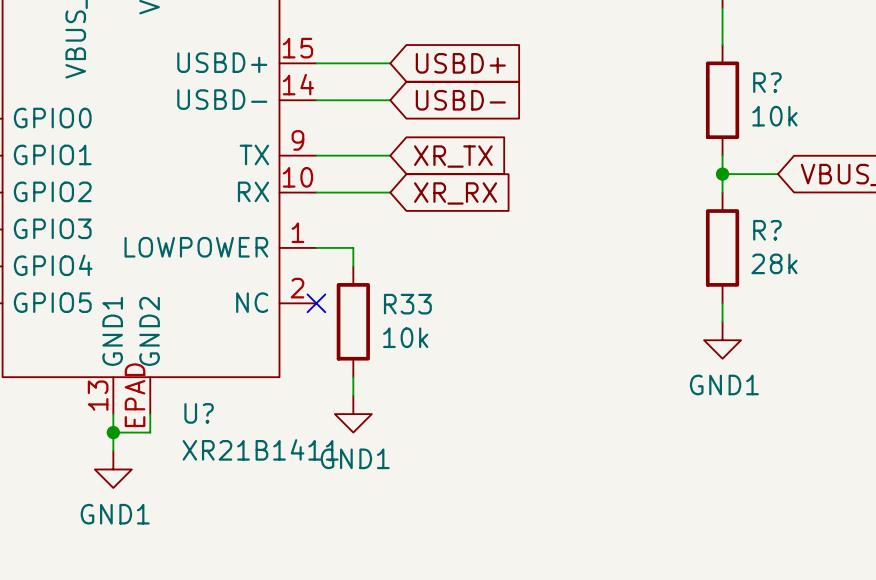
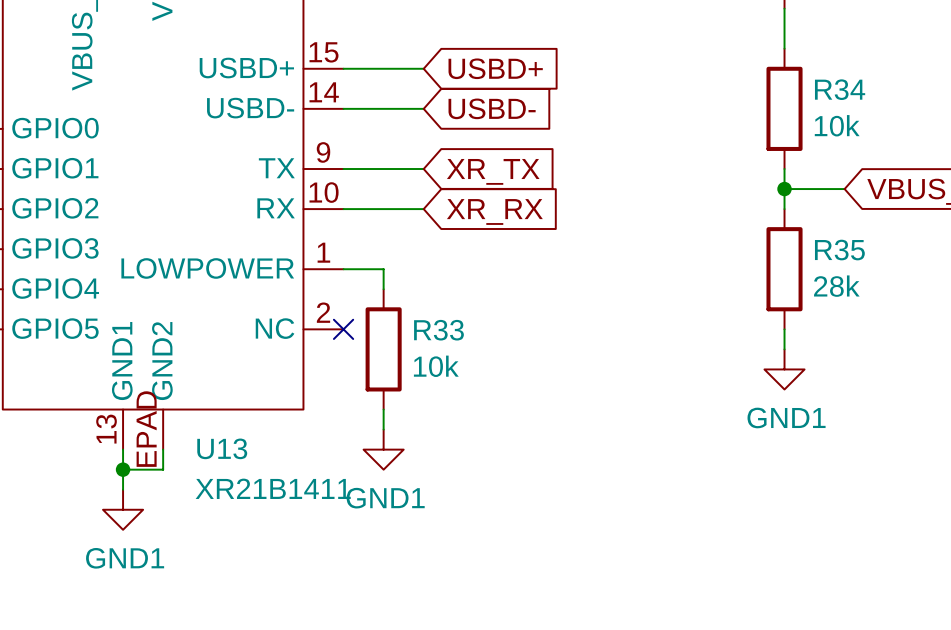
R? name: R? (767, 82) -> R34 (840, 89)
R? name: R? (767, 230) -> R35 (839, 250)
U? name: U? (199, 413) -> U13 (222, 448)

